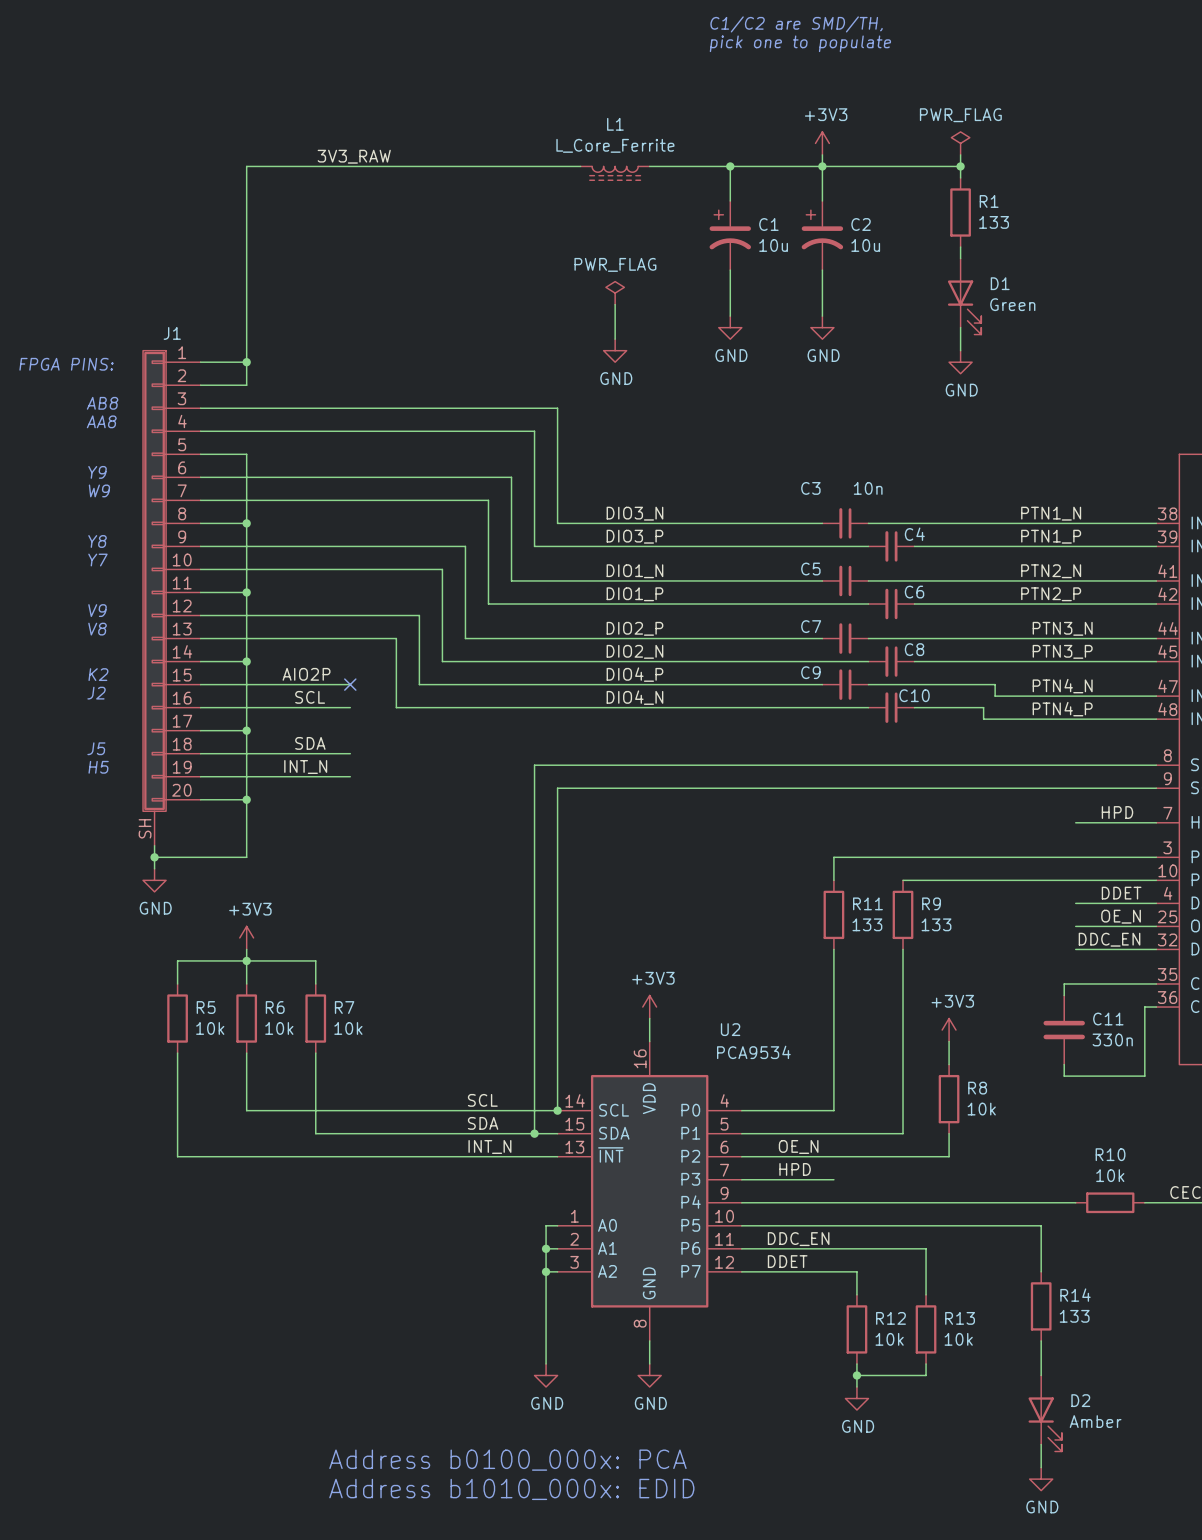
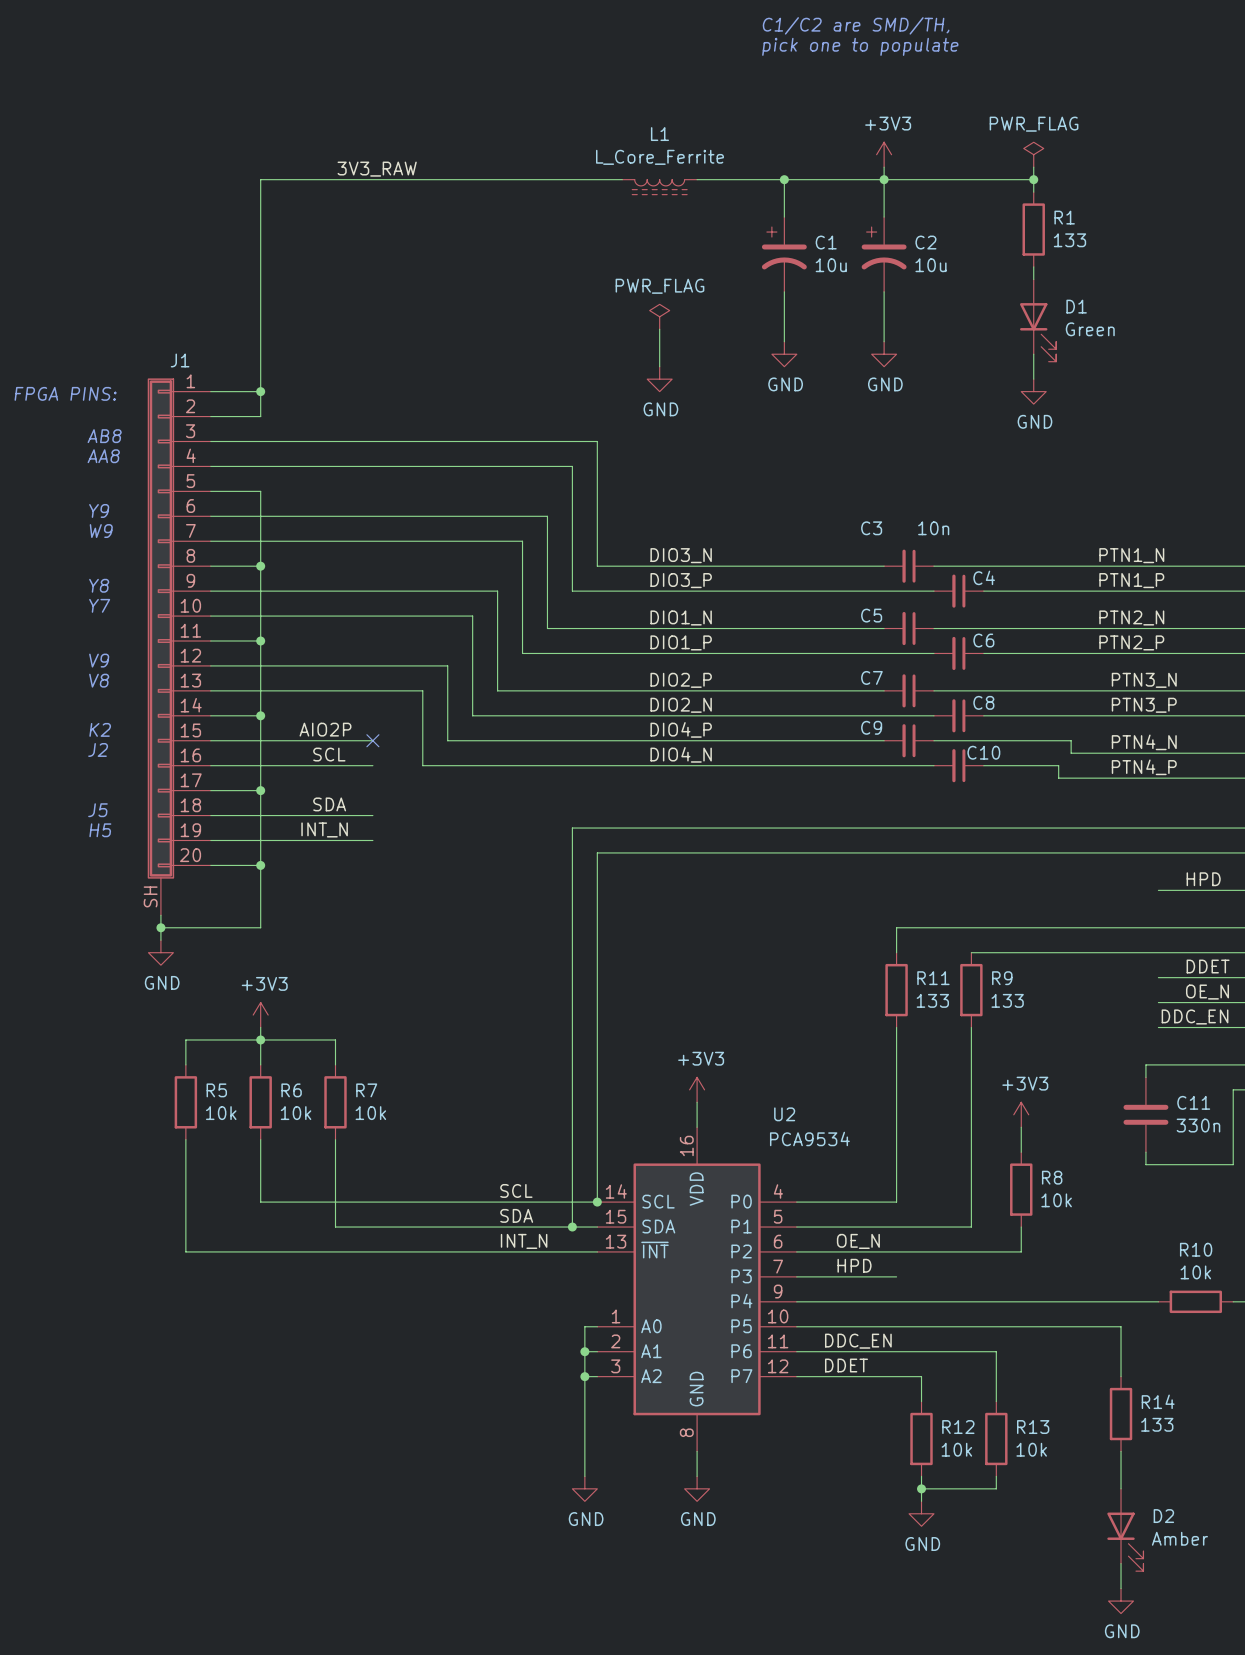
text: Address b0100_000x: PCA (507, 1460) -> none
text: Address b1010_000x: EDID (511, 1489) -> none

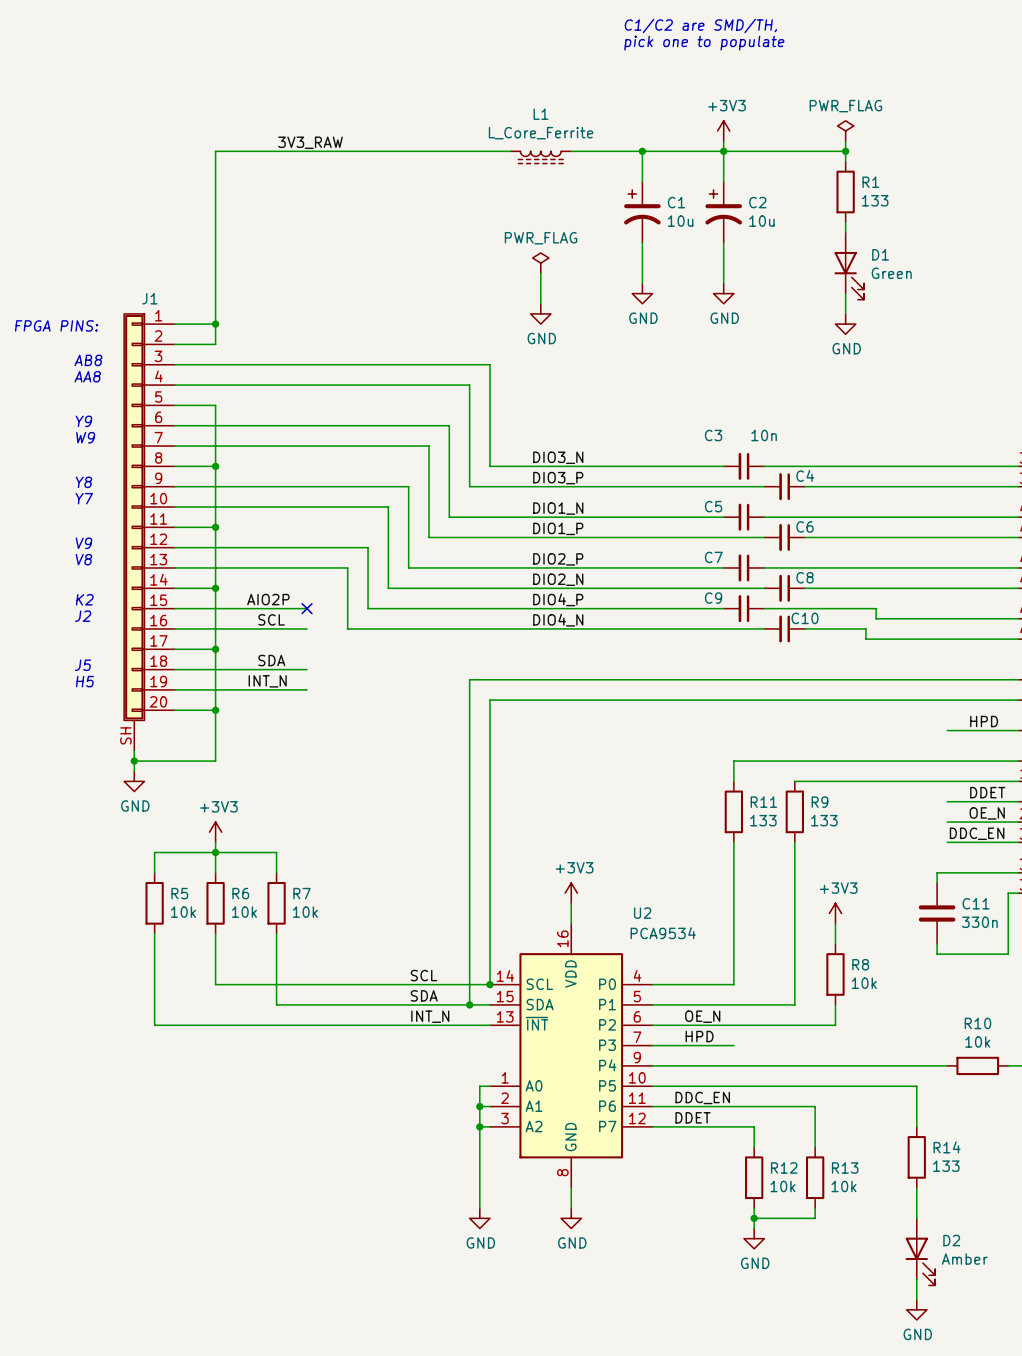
label: PTN1_N (1131, 555) -> none
label: PTN1_P (1131, 580) -> none
label: PTN2_N (1131, 617) -> none
label: PTN2_P (1131, 642) -> none
label: PTN3_N (1144, 680) -> none
label: PTN3_P (1144, 705) -> none
label: PTN4_N (1144, 742) -> none
label: PTN4_P (1144, 767) -> none

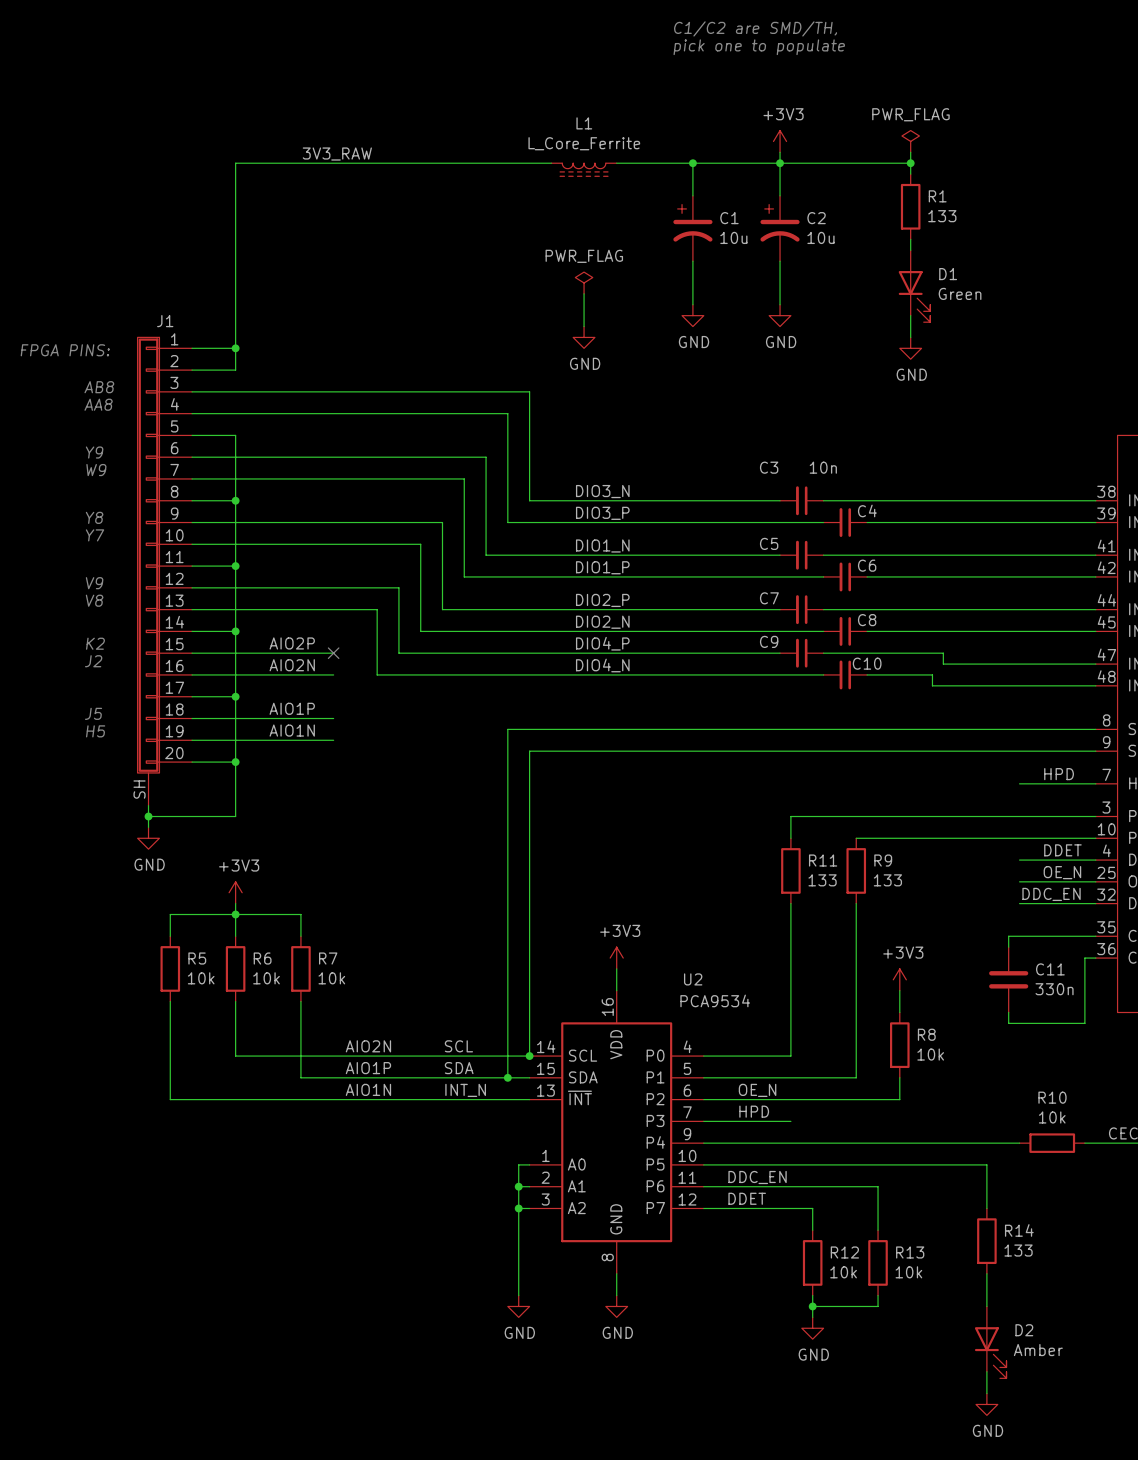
label: none -> AIO2N (292, 665)
label: SCL (271, 619) -> none
label: none -> AIO1P (292, 708)
label: SDA (271, 660) -> none
label: INT_N (267, 681) -> AIO1N (292, 730)
label: none -> AIO2N (368, 1046)
label: none -> AIO1P (368, 1068)
label: none -> AIO1N (368, 1089)

